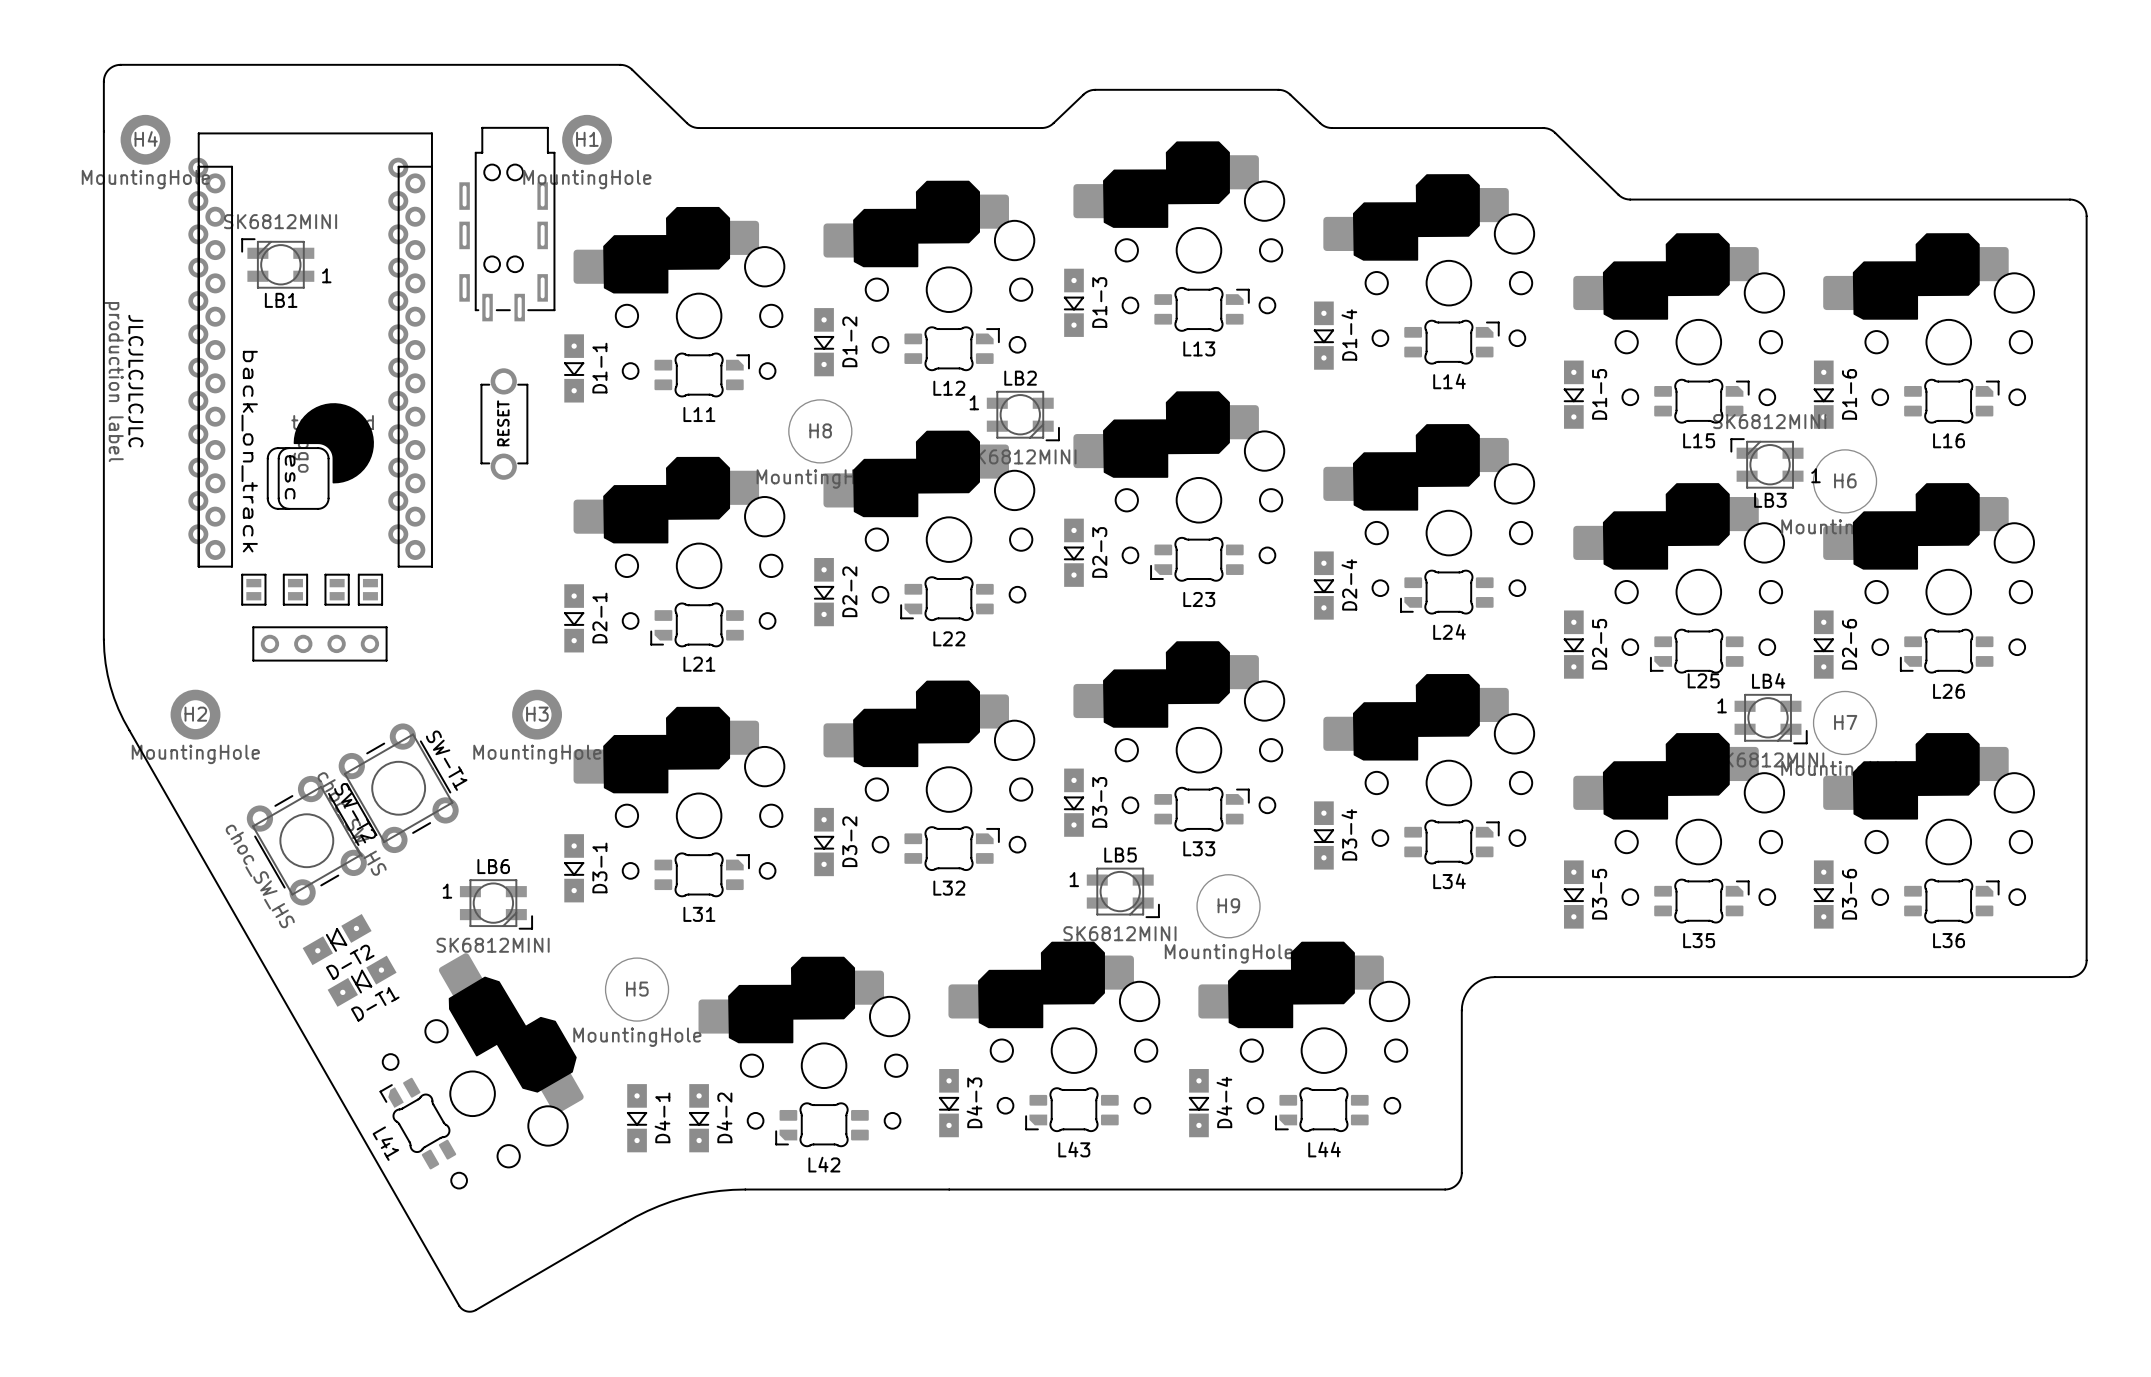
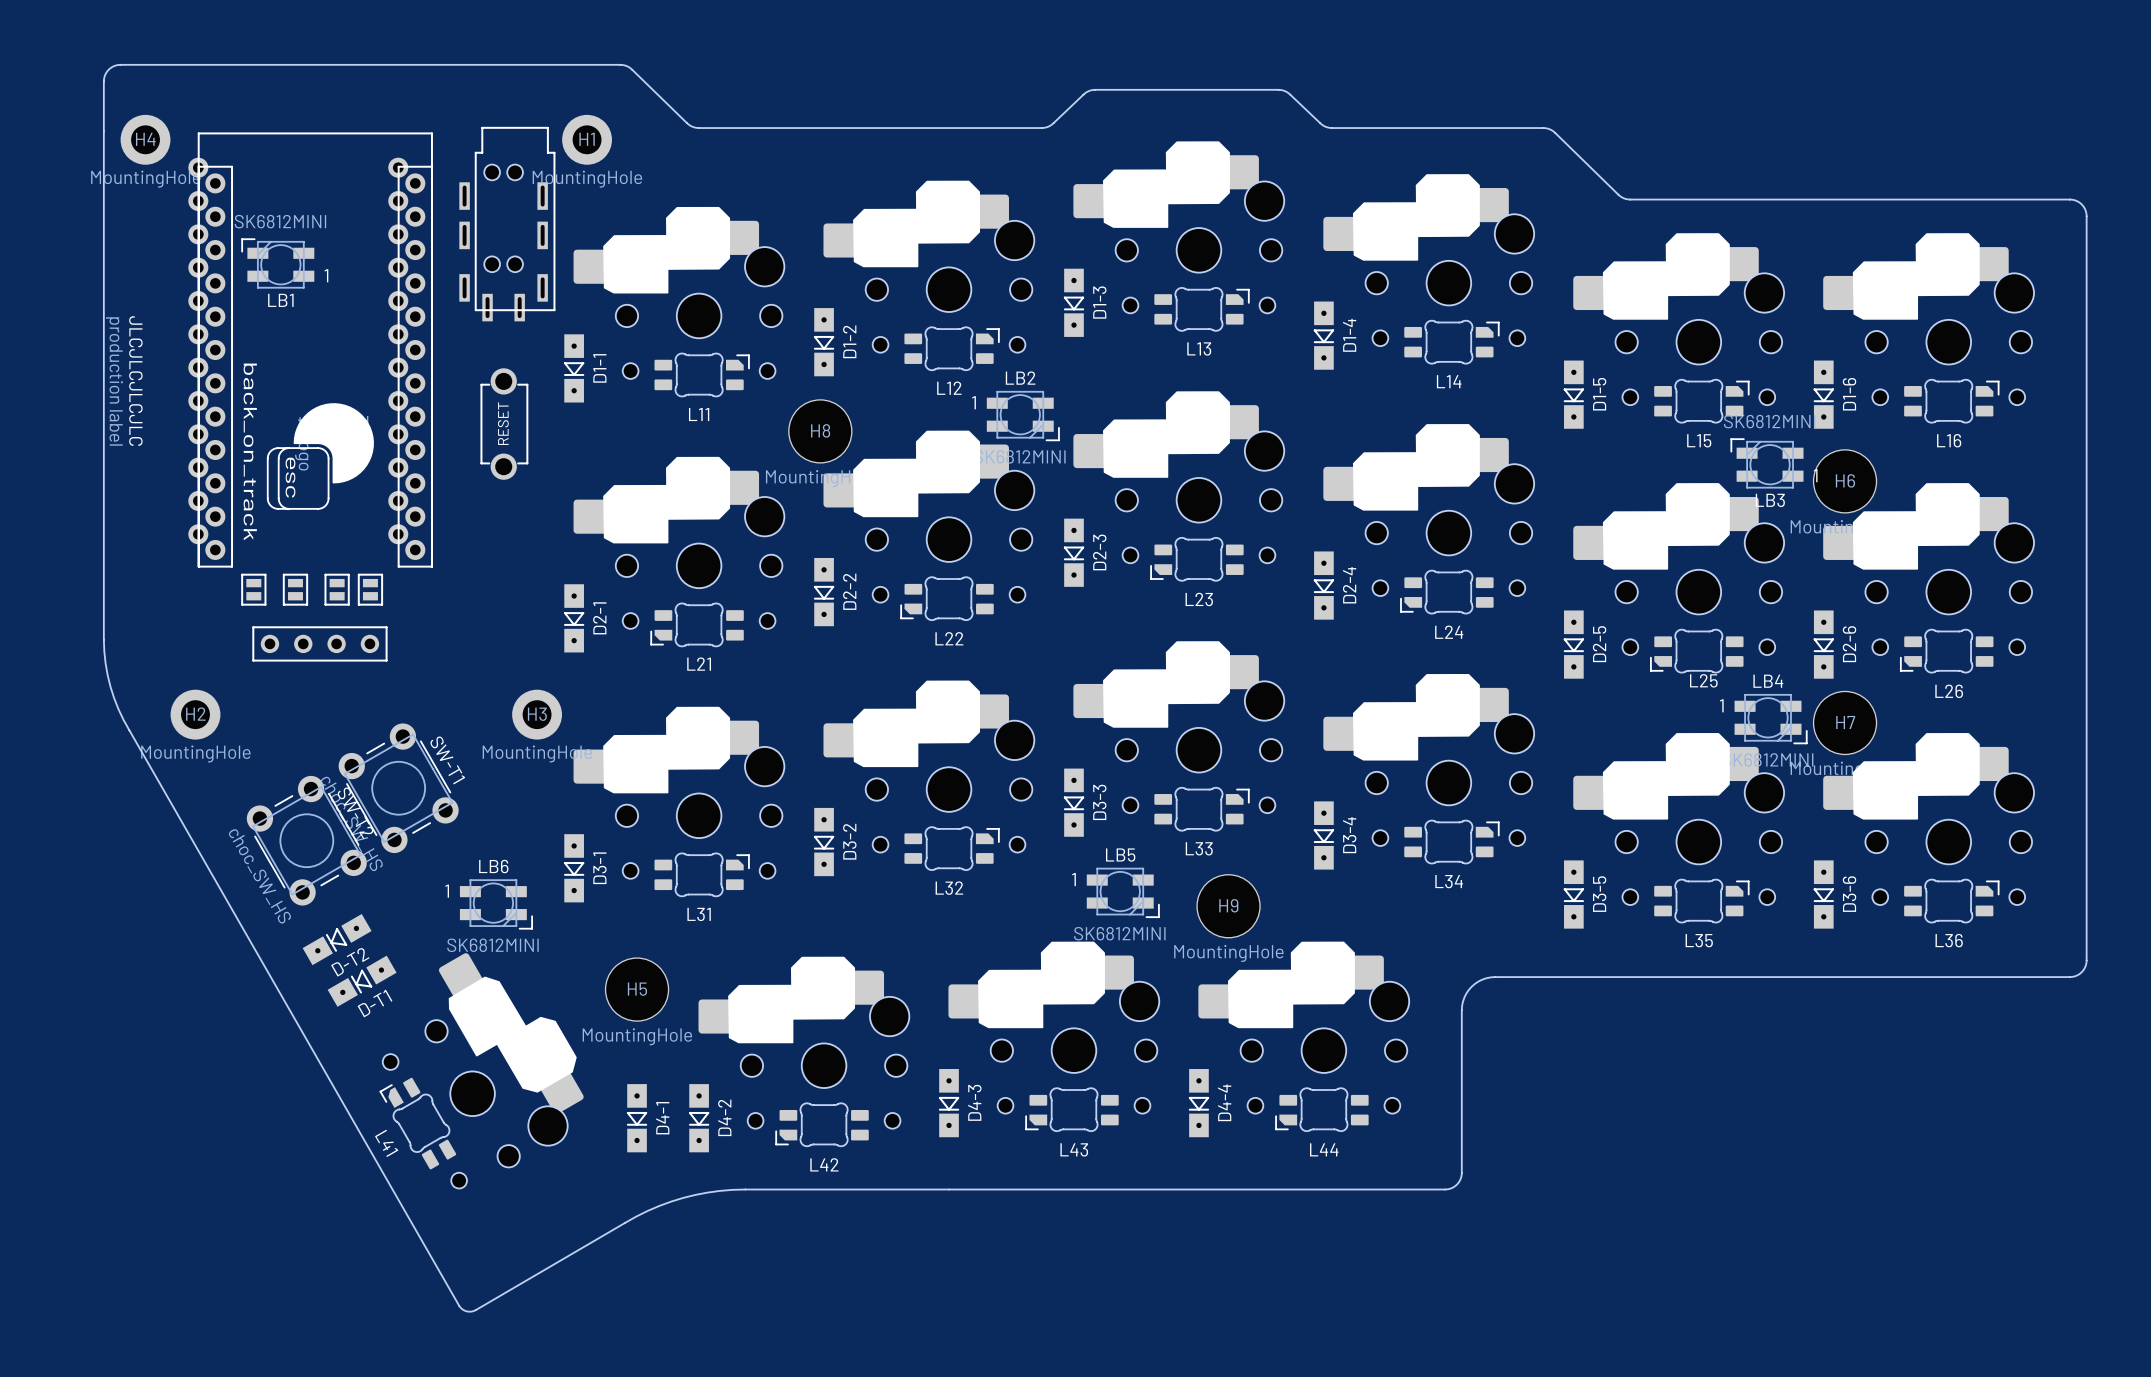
part footprint: [459, 126, 556, 322] -> [459, 126, 556, 322]

